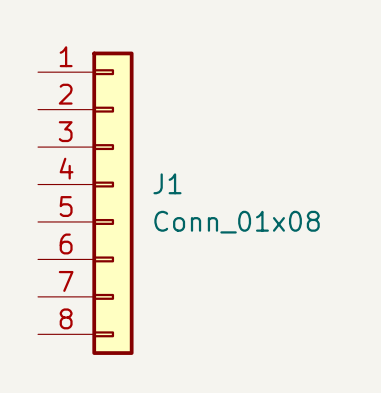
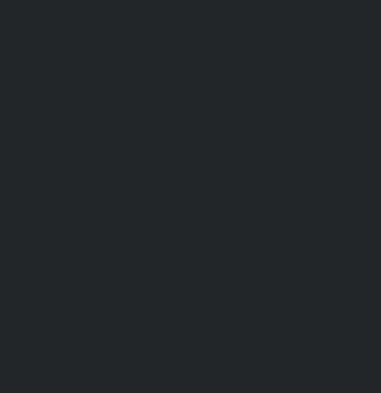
J1: Conn_01x08 (85, 203) -> none

